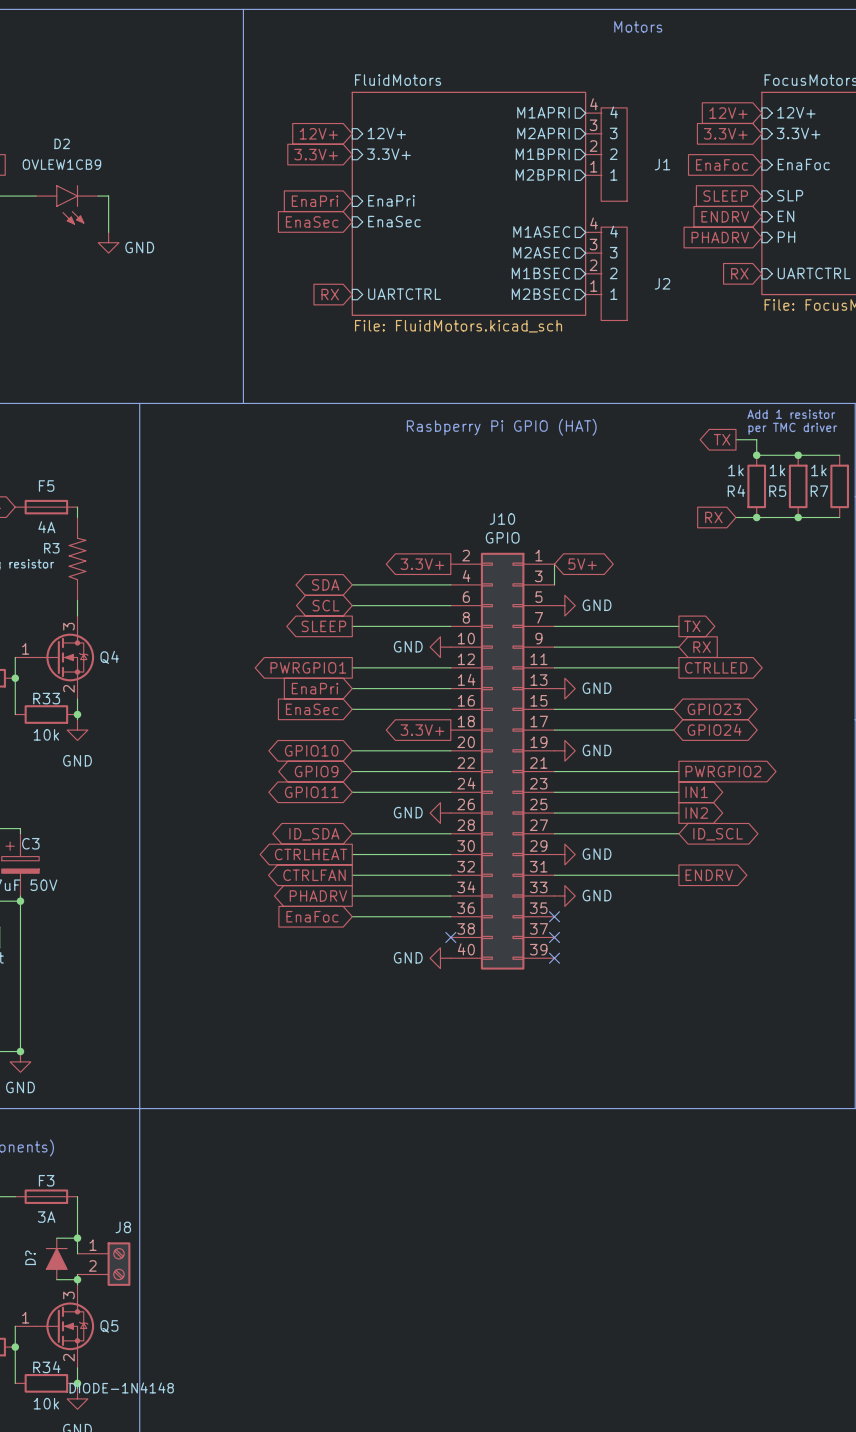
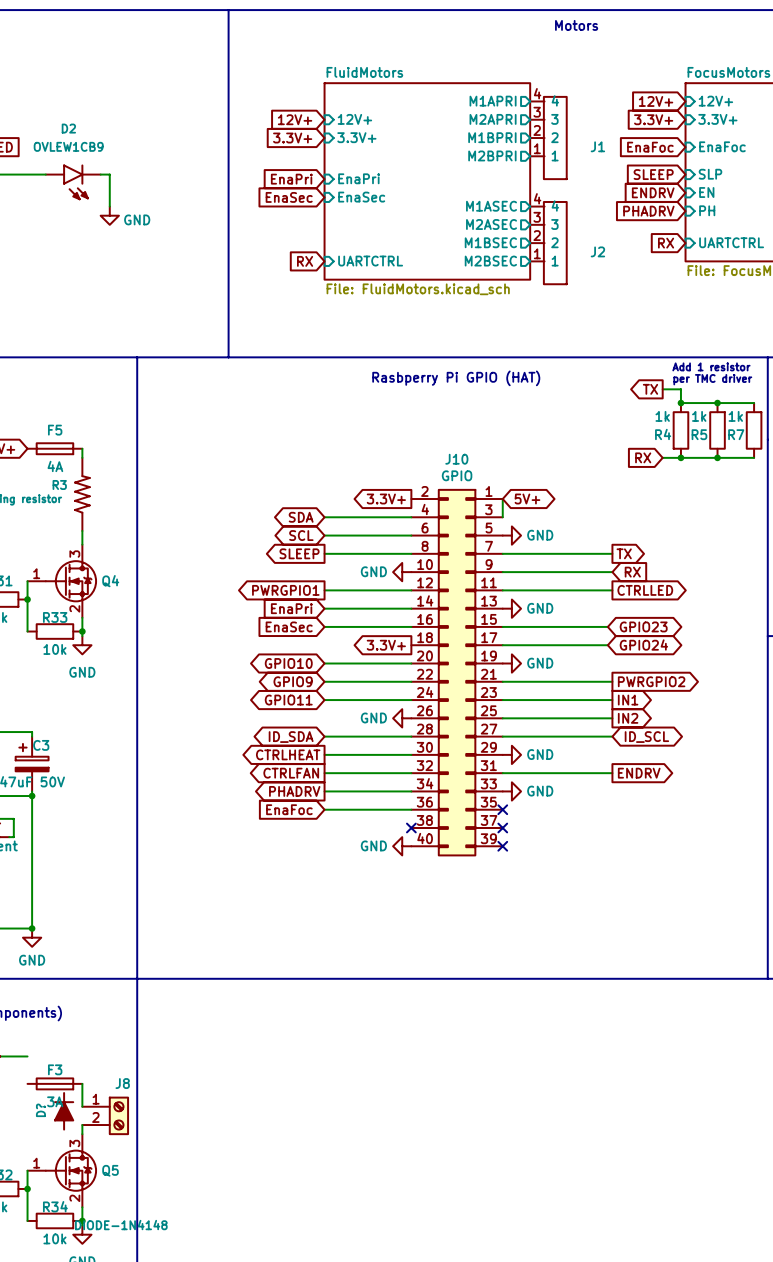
F3 position: (46, 1196) -> (54, 1083)
wire: (77, 1196) (77, 1227) -> none
wire: (56, 1238) (77, 1238) -> none
junction: (77, 1238) -> none
wire: (56, 1279) (77, 1279) -> none
junction: (77, 1279) -> none

